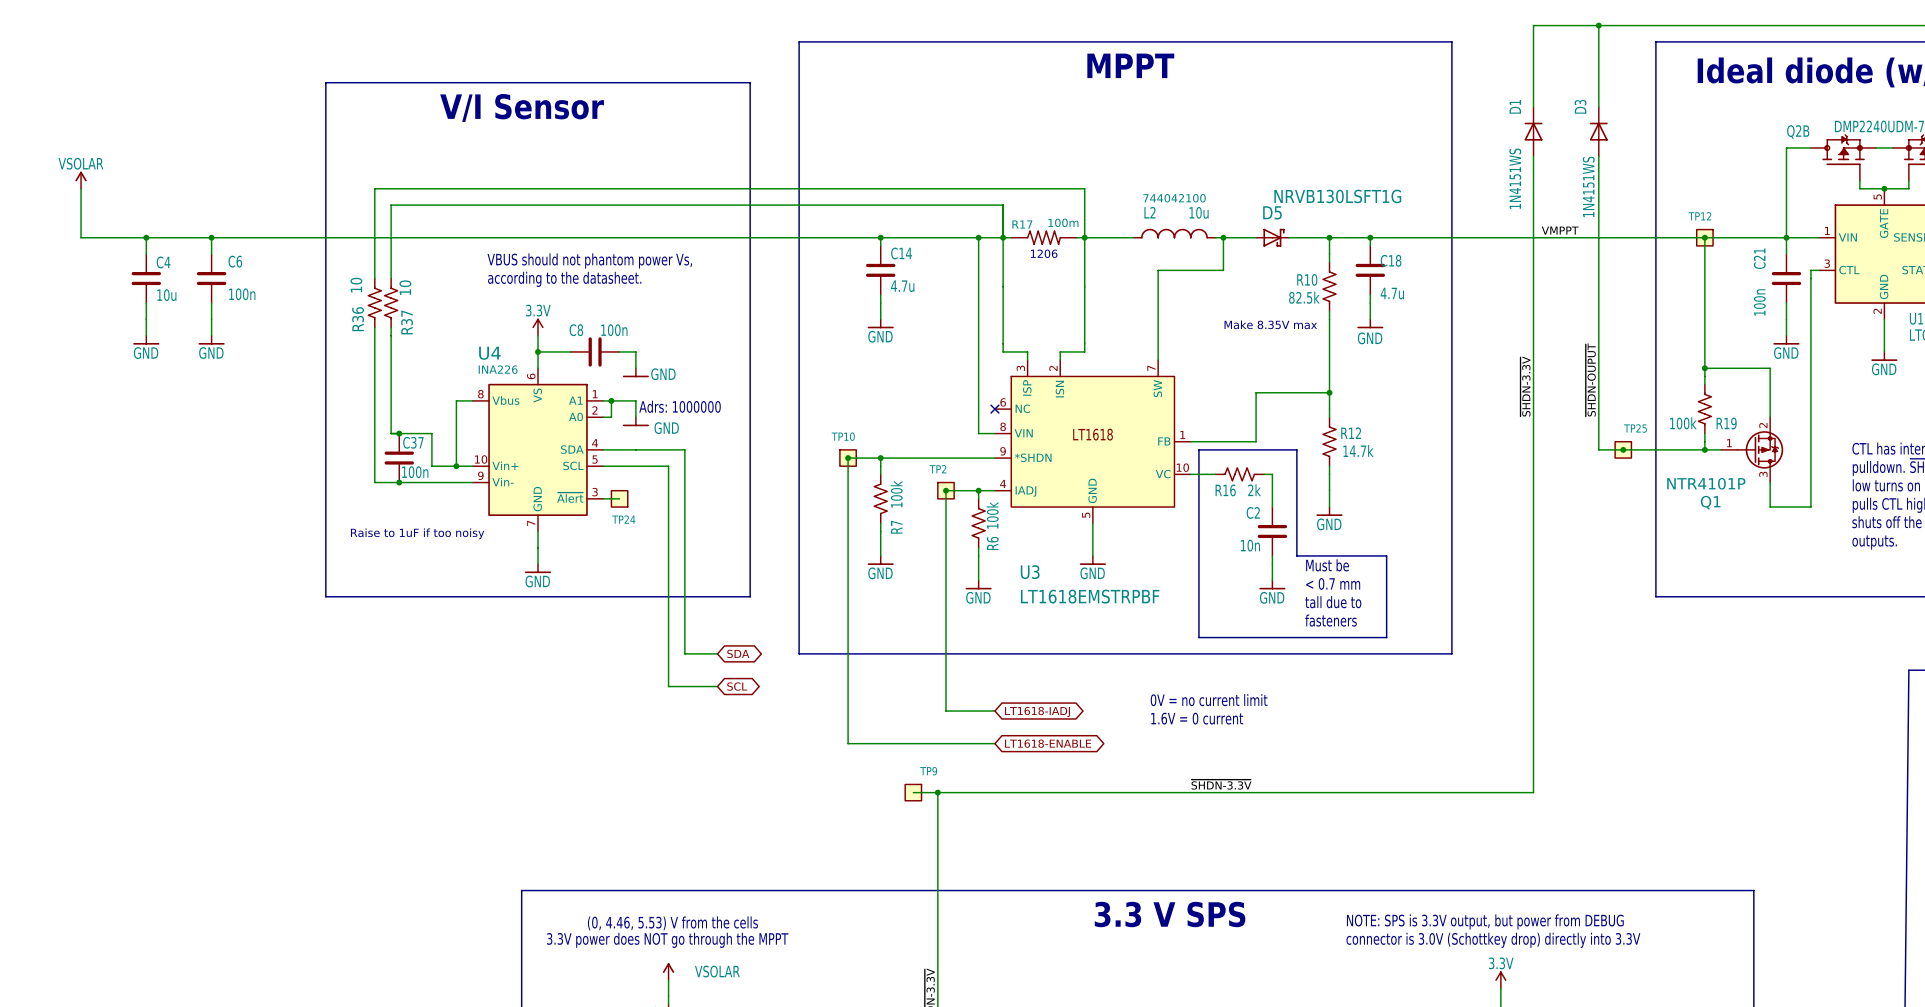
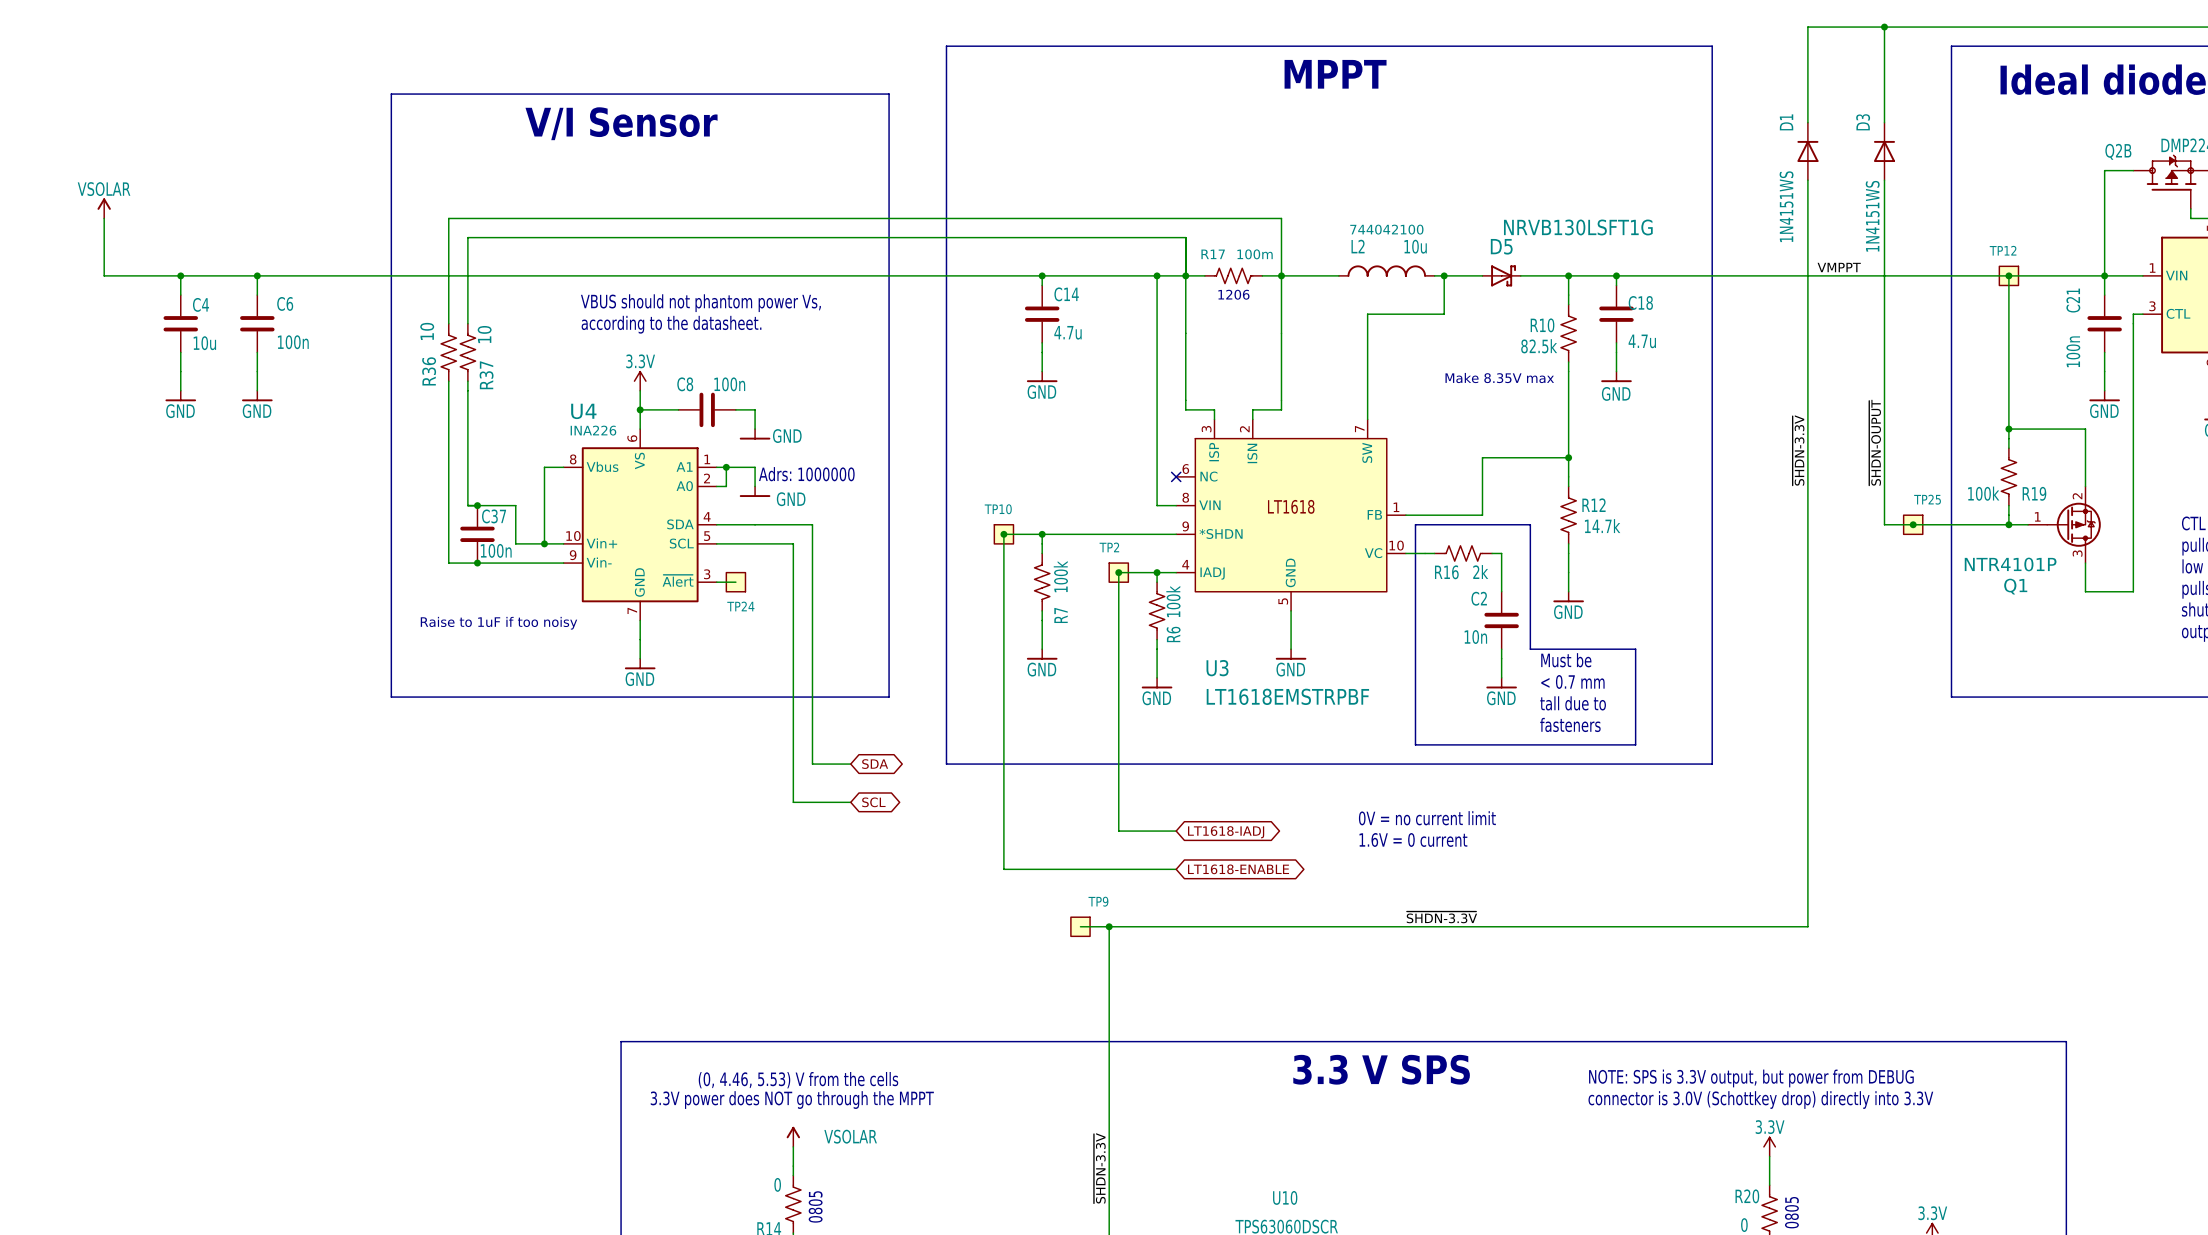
R17 symbol: [1011, 230, 1077, 245] -> [1204, 268, 1263, 284]

